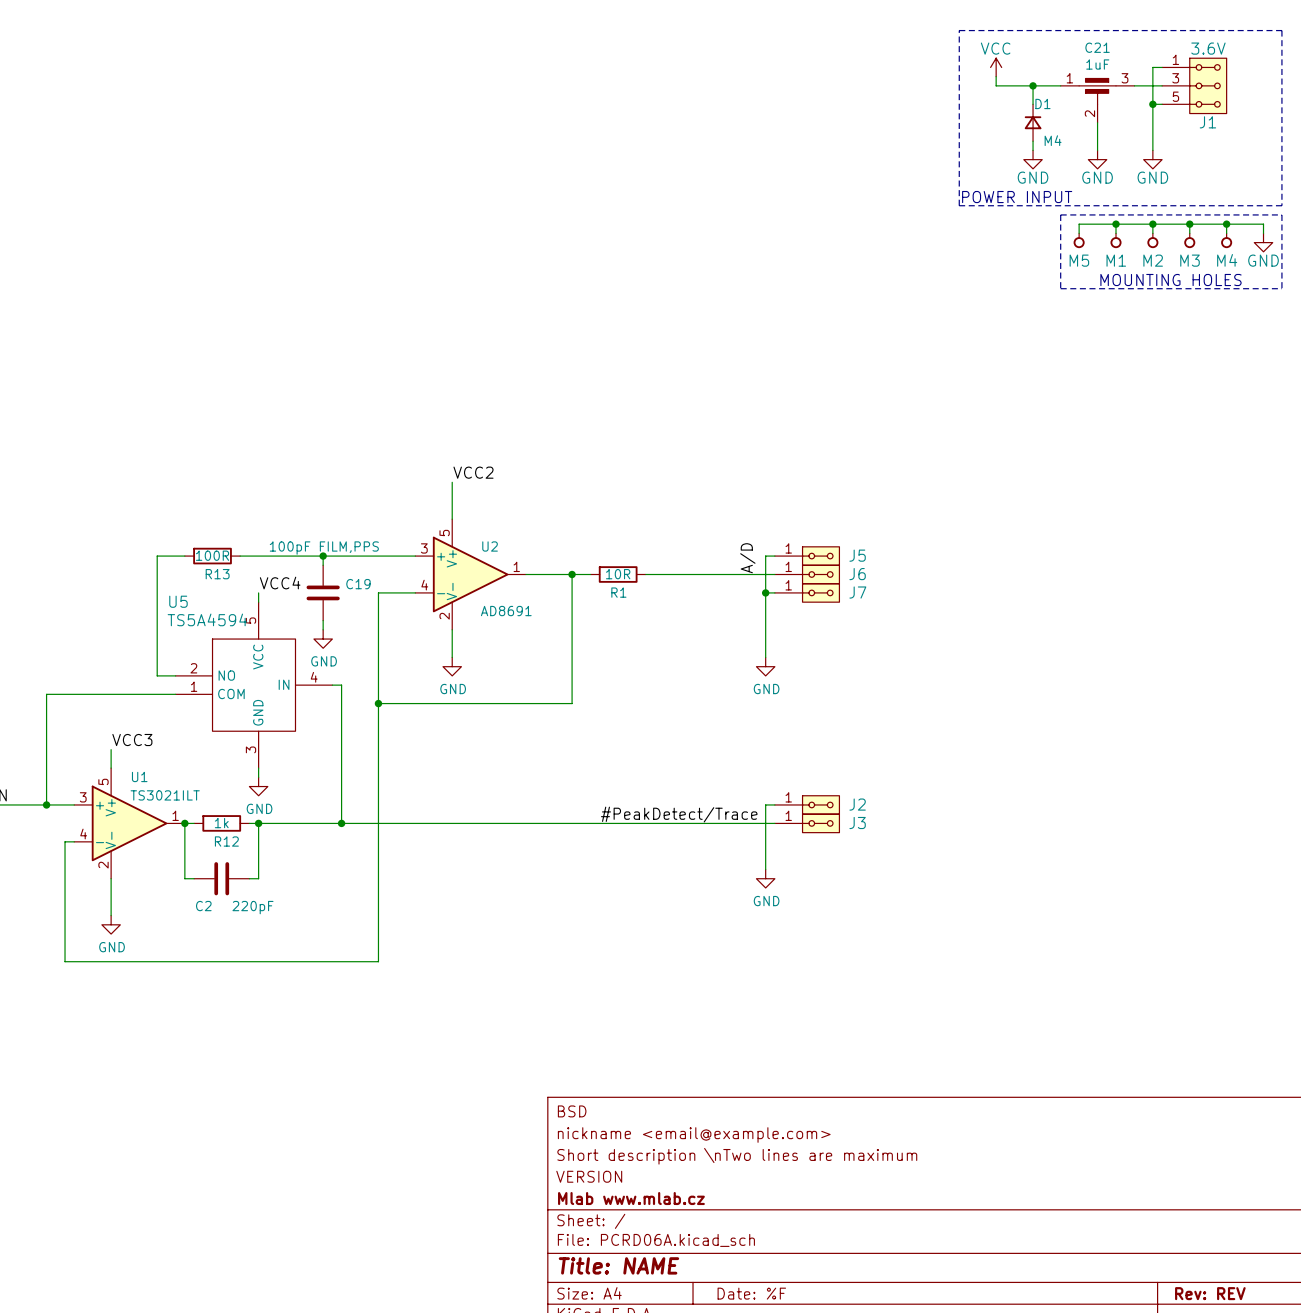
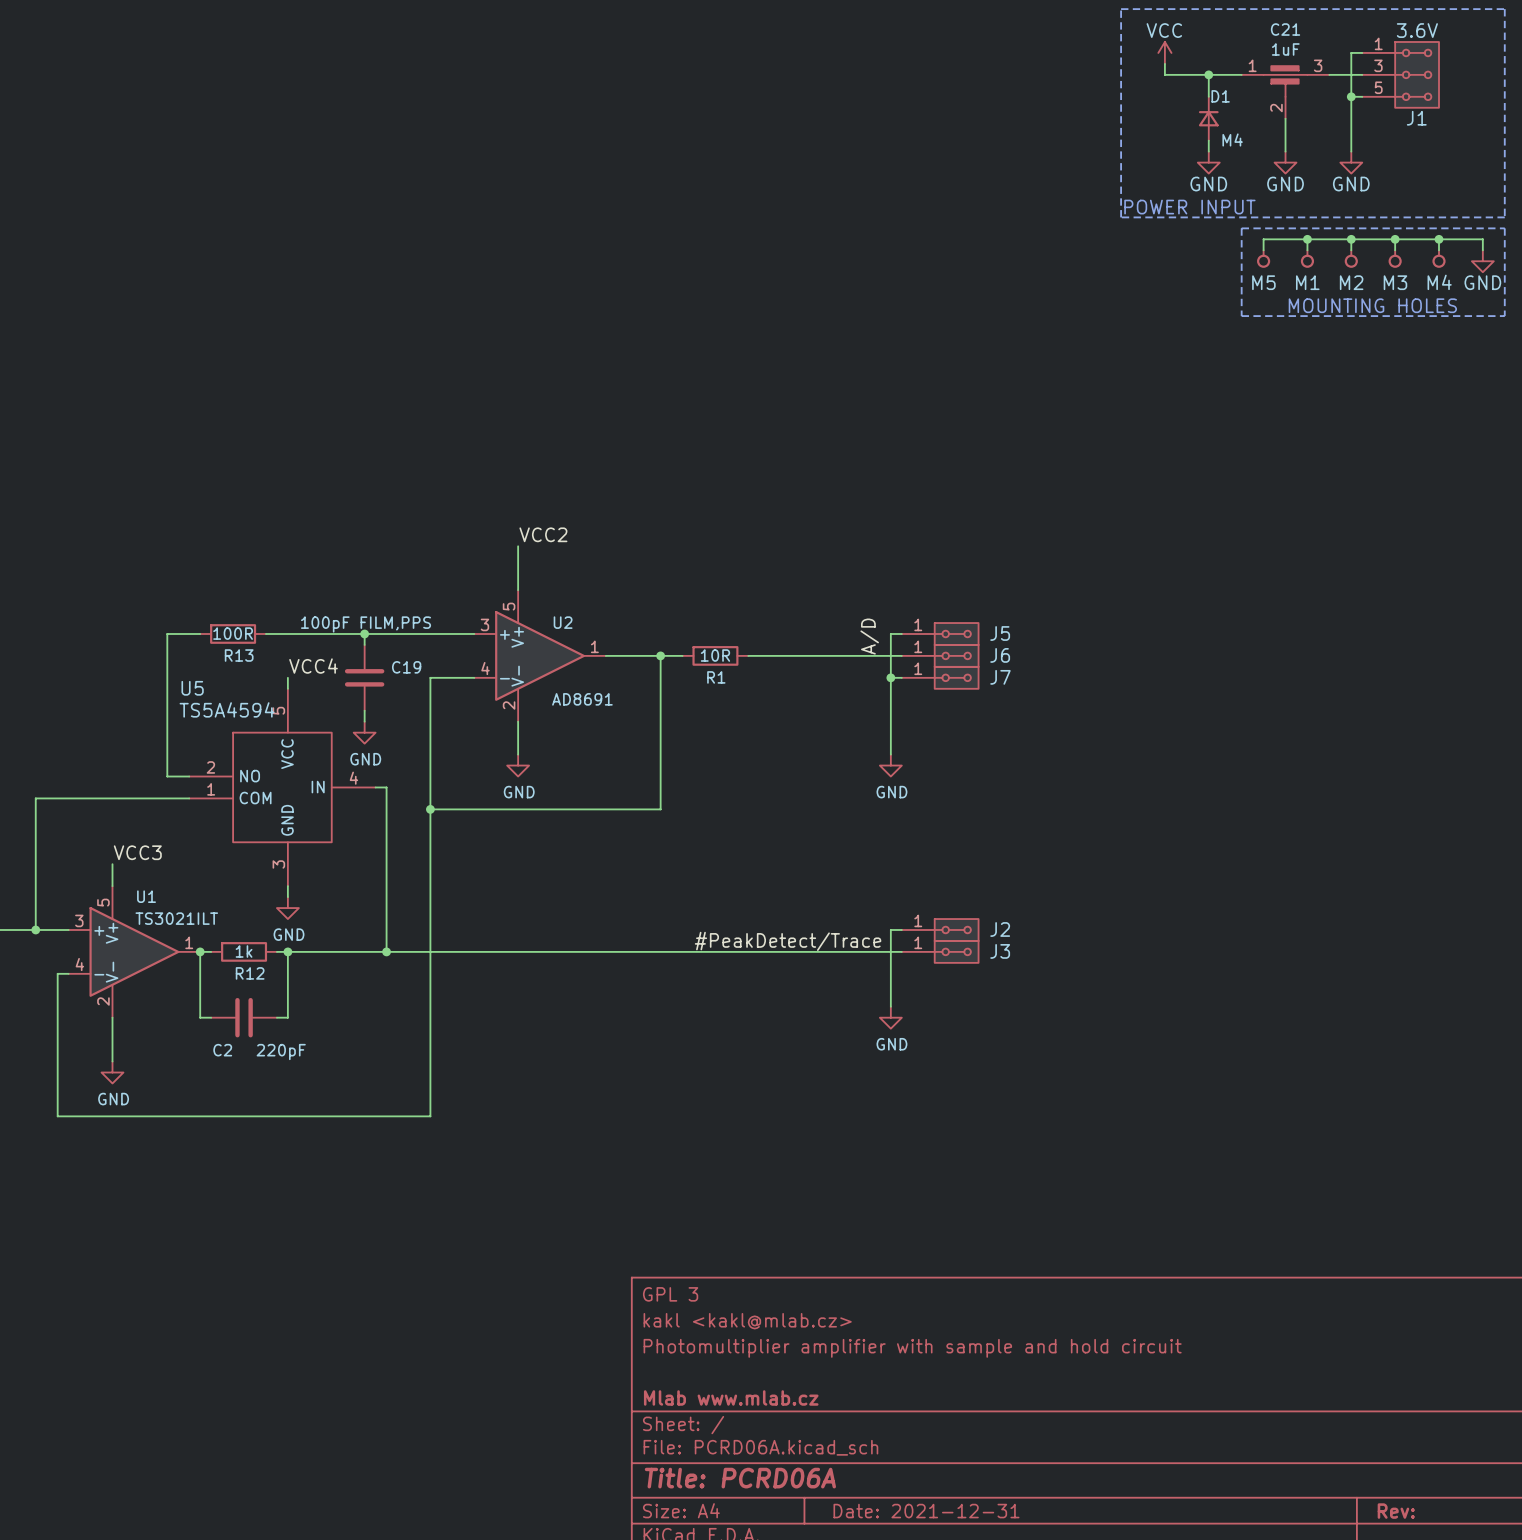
title block: BSD (572, 1111) -> GPL 3 (670, 1294)
title block: nickname <email@example.com> (694, 1135) -> kakl <kakl@mlab.cz> (747, 1321)
title block: Short description \nTwo lines are maximum (737, 1156) -> Photomultiplier amplifier with sample and hold circuit (912, 1348)
title block: VERSION (589, 1176) -> none
title block: Title: NAME (618, 1265) -> Title: PCRD06A (740, 1478)
title block: Date: %F (751, 1293) -> Date: 2021-12-31 (926, 1511)
title block: Rev: REV (1210, 1293) -> Rev: (1396, 1511)

